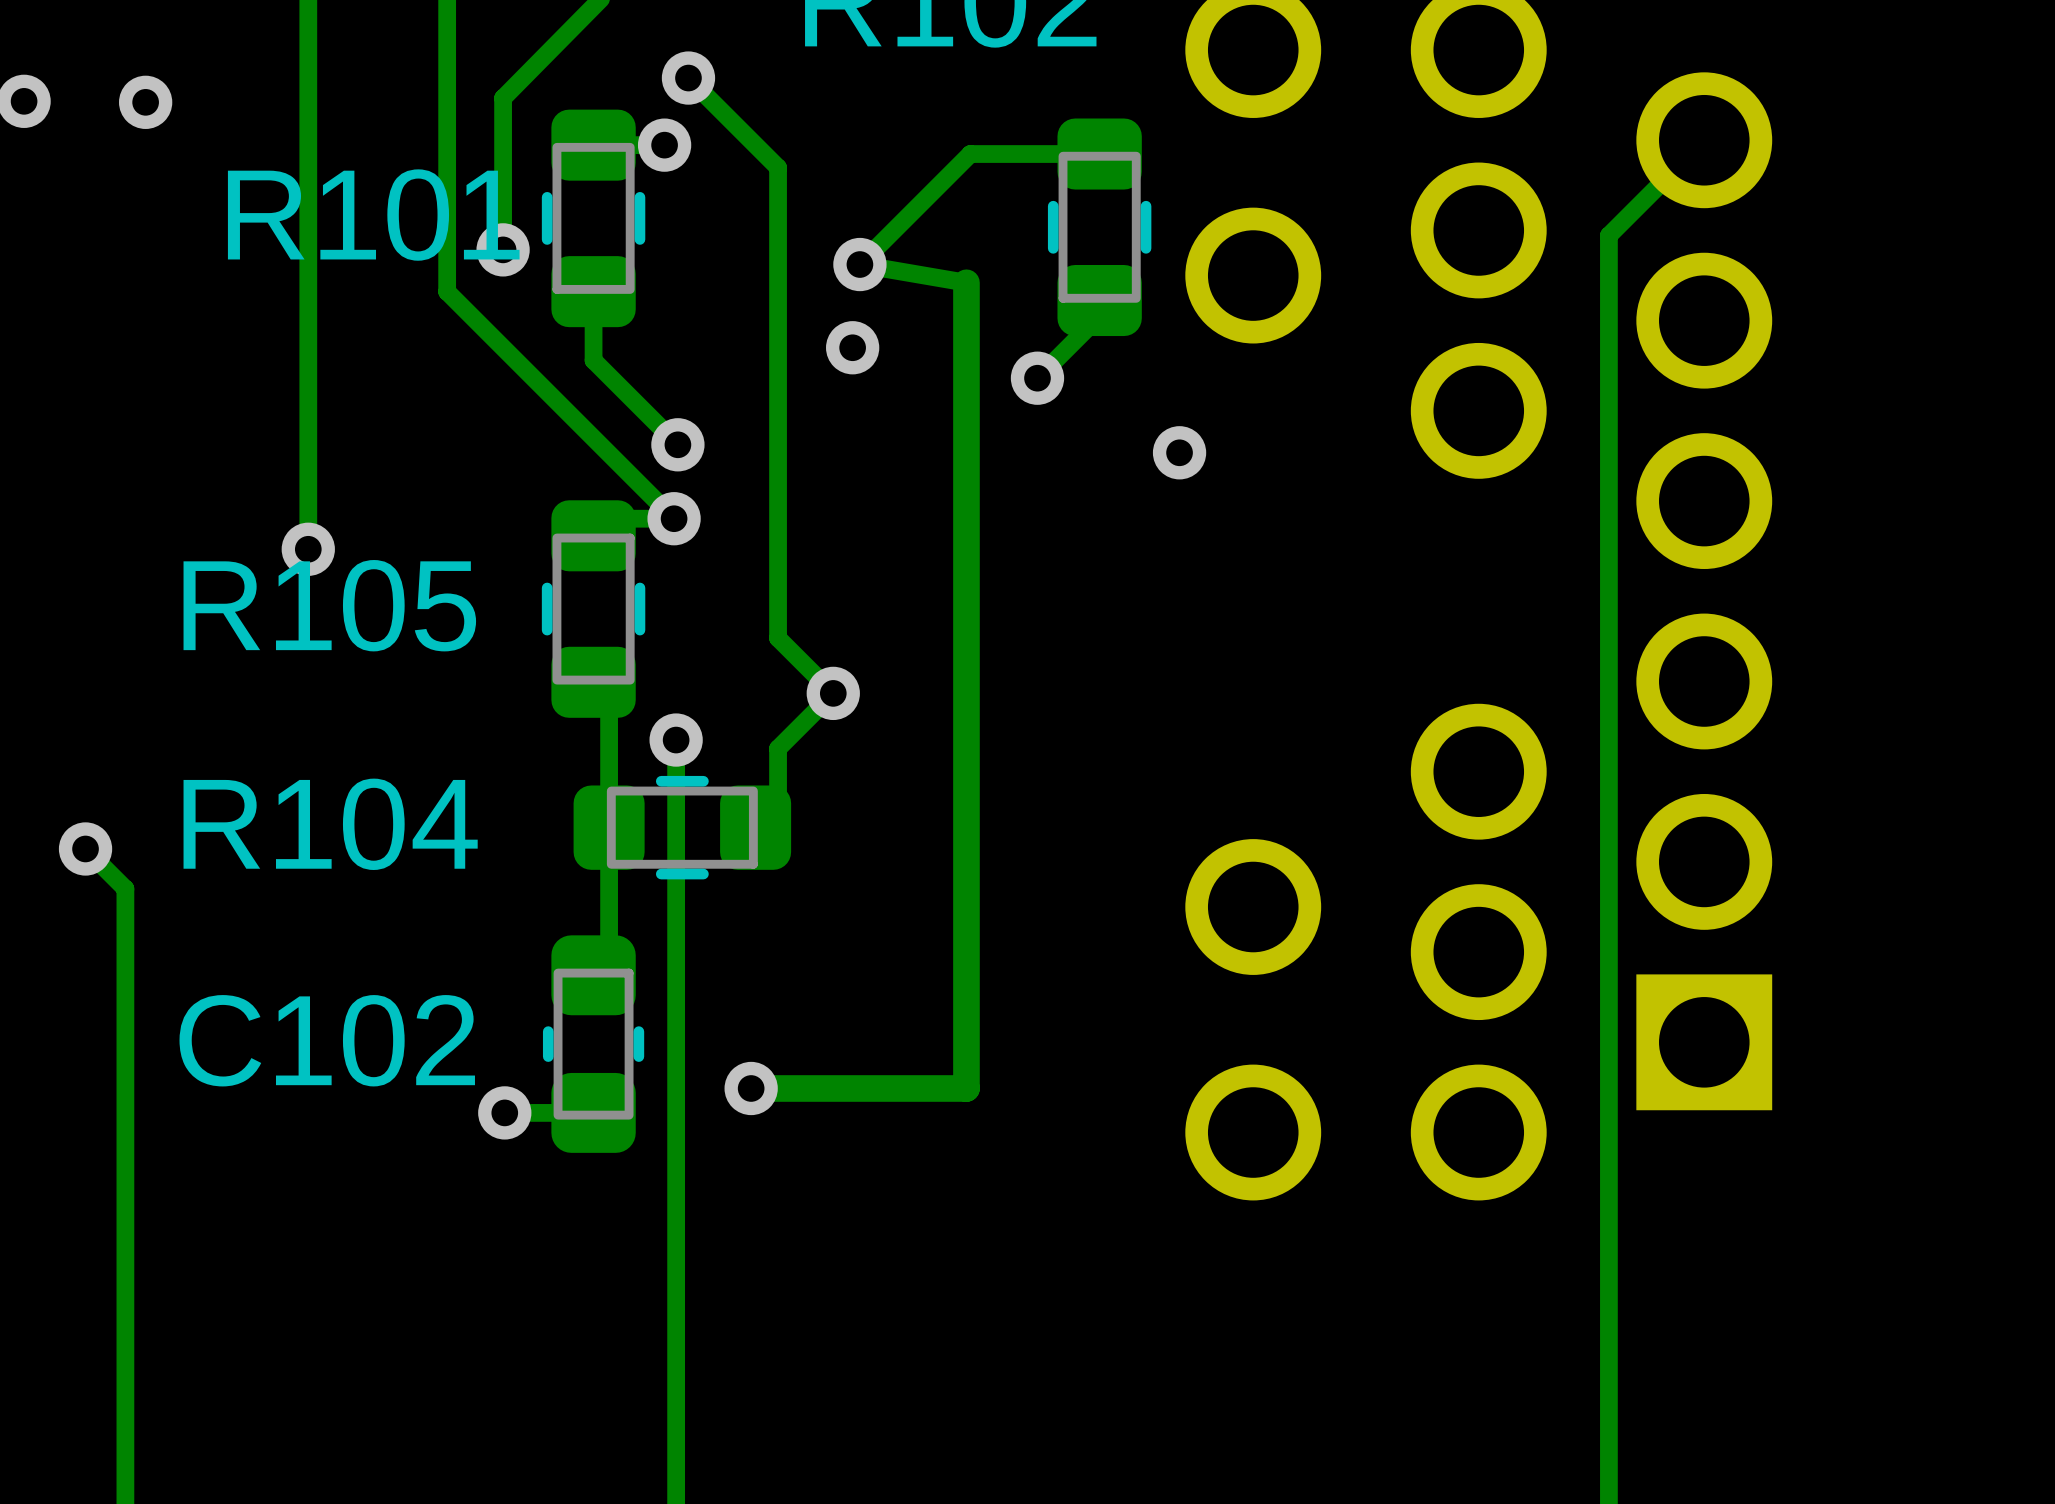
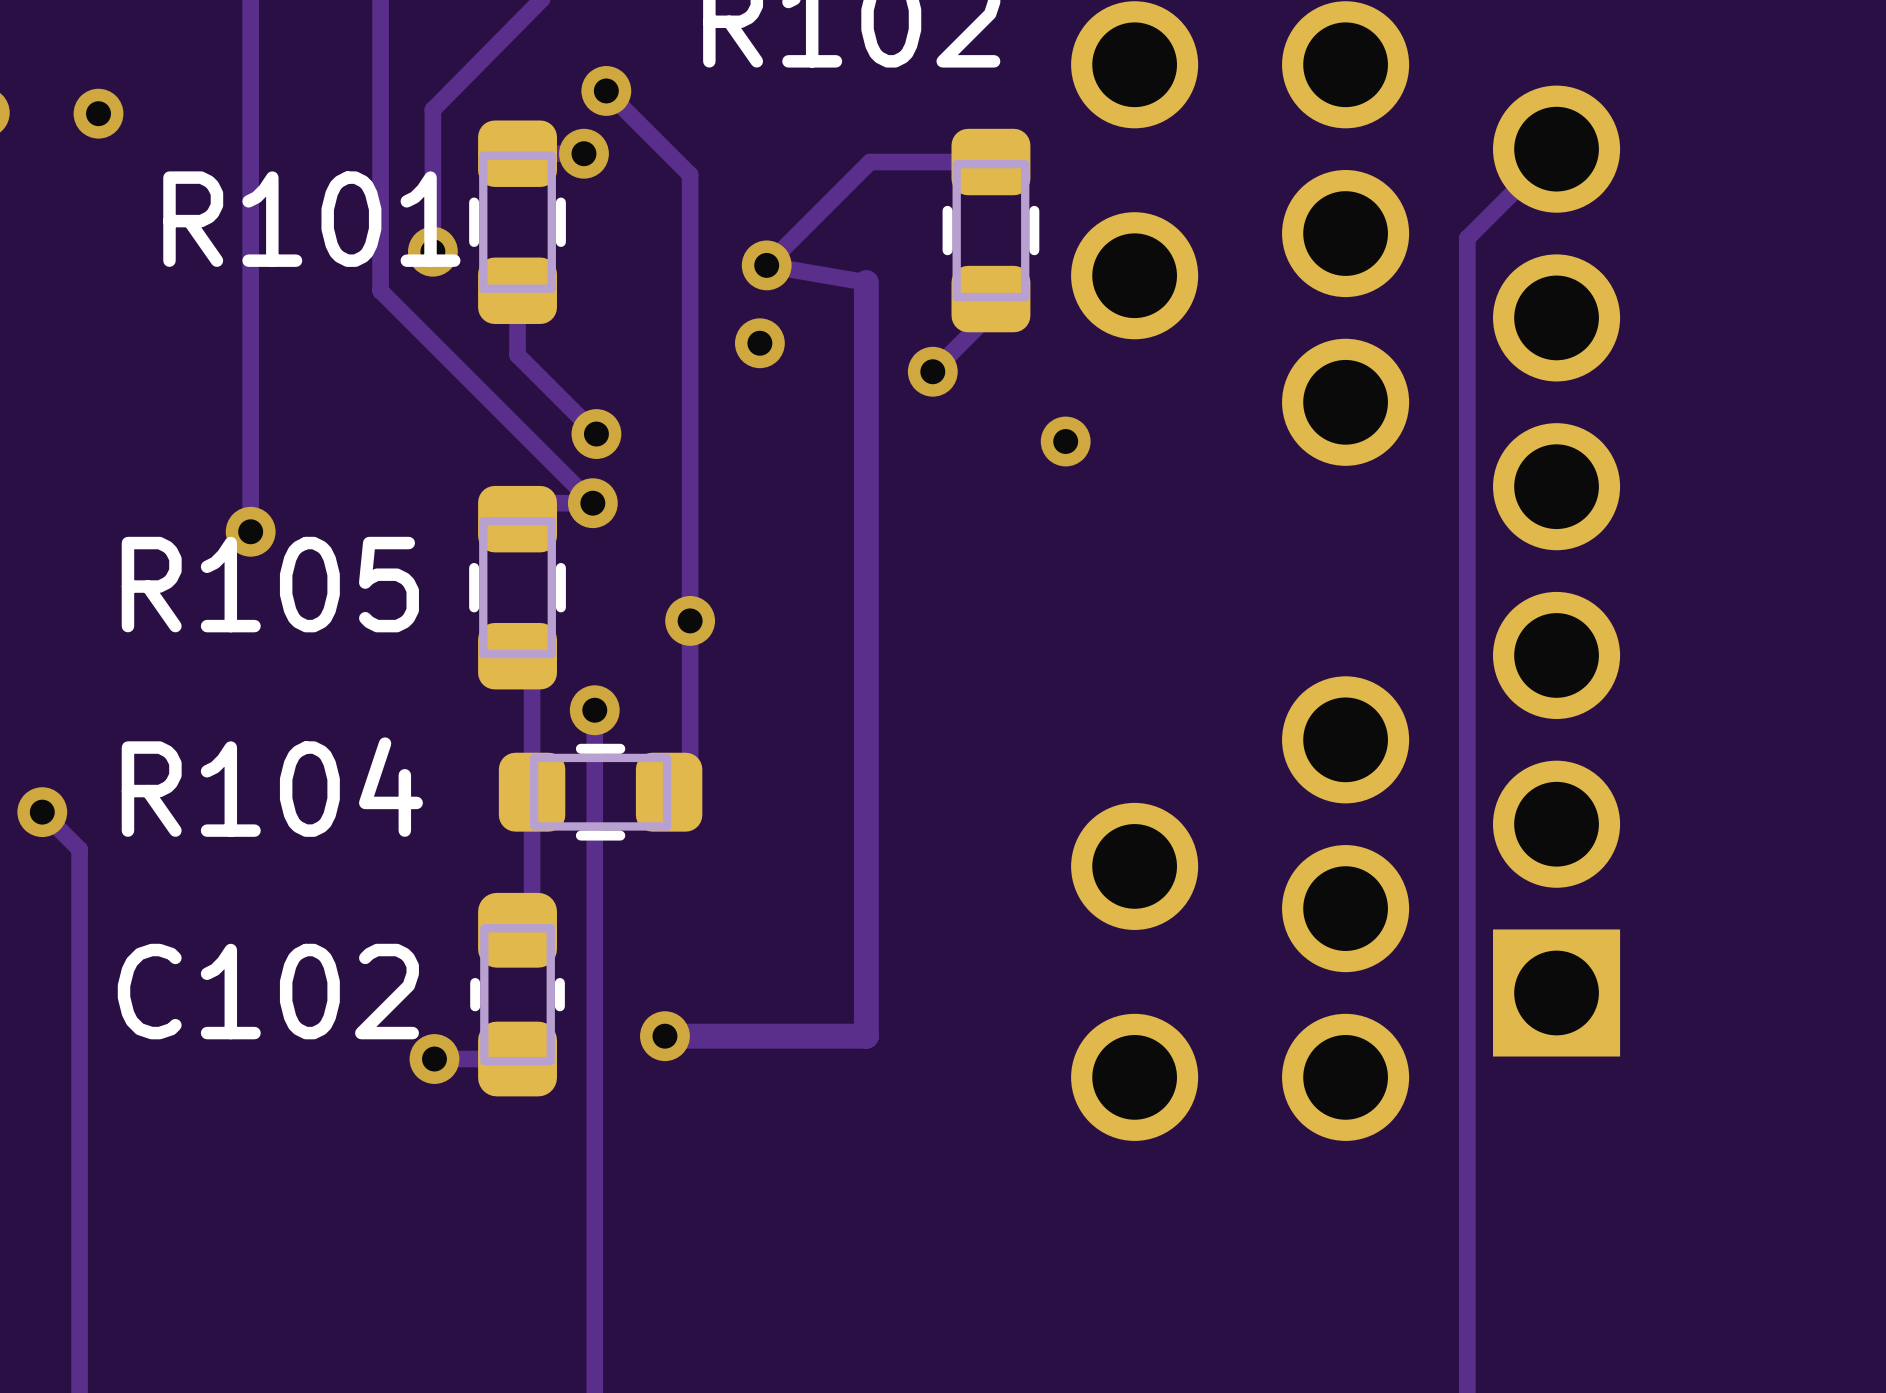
track: (778, 638) (833, 693) (778, 748) -> (690, 614) (690, 718)
via position: (833, 693) -> (690, 620)

